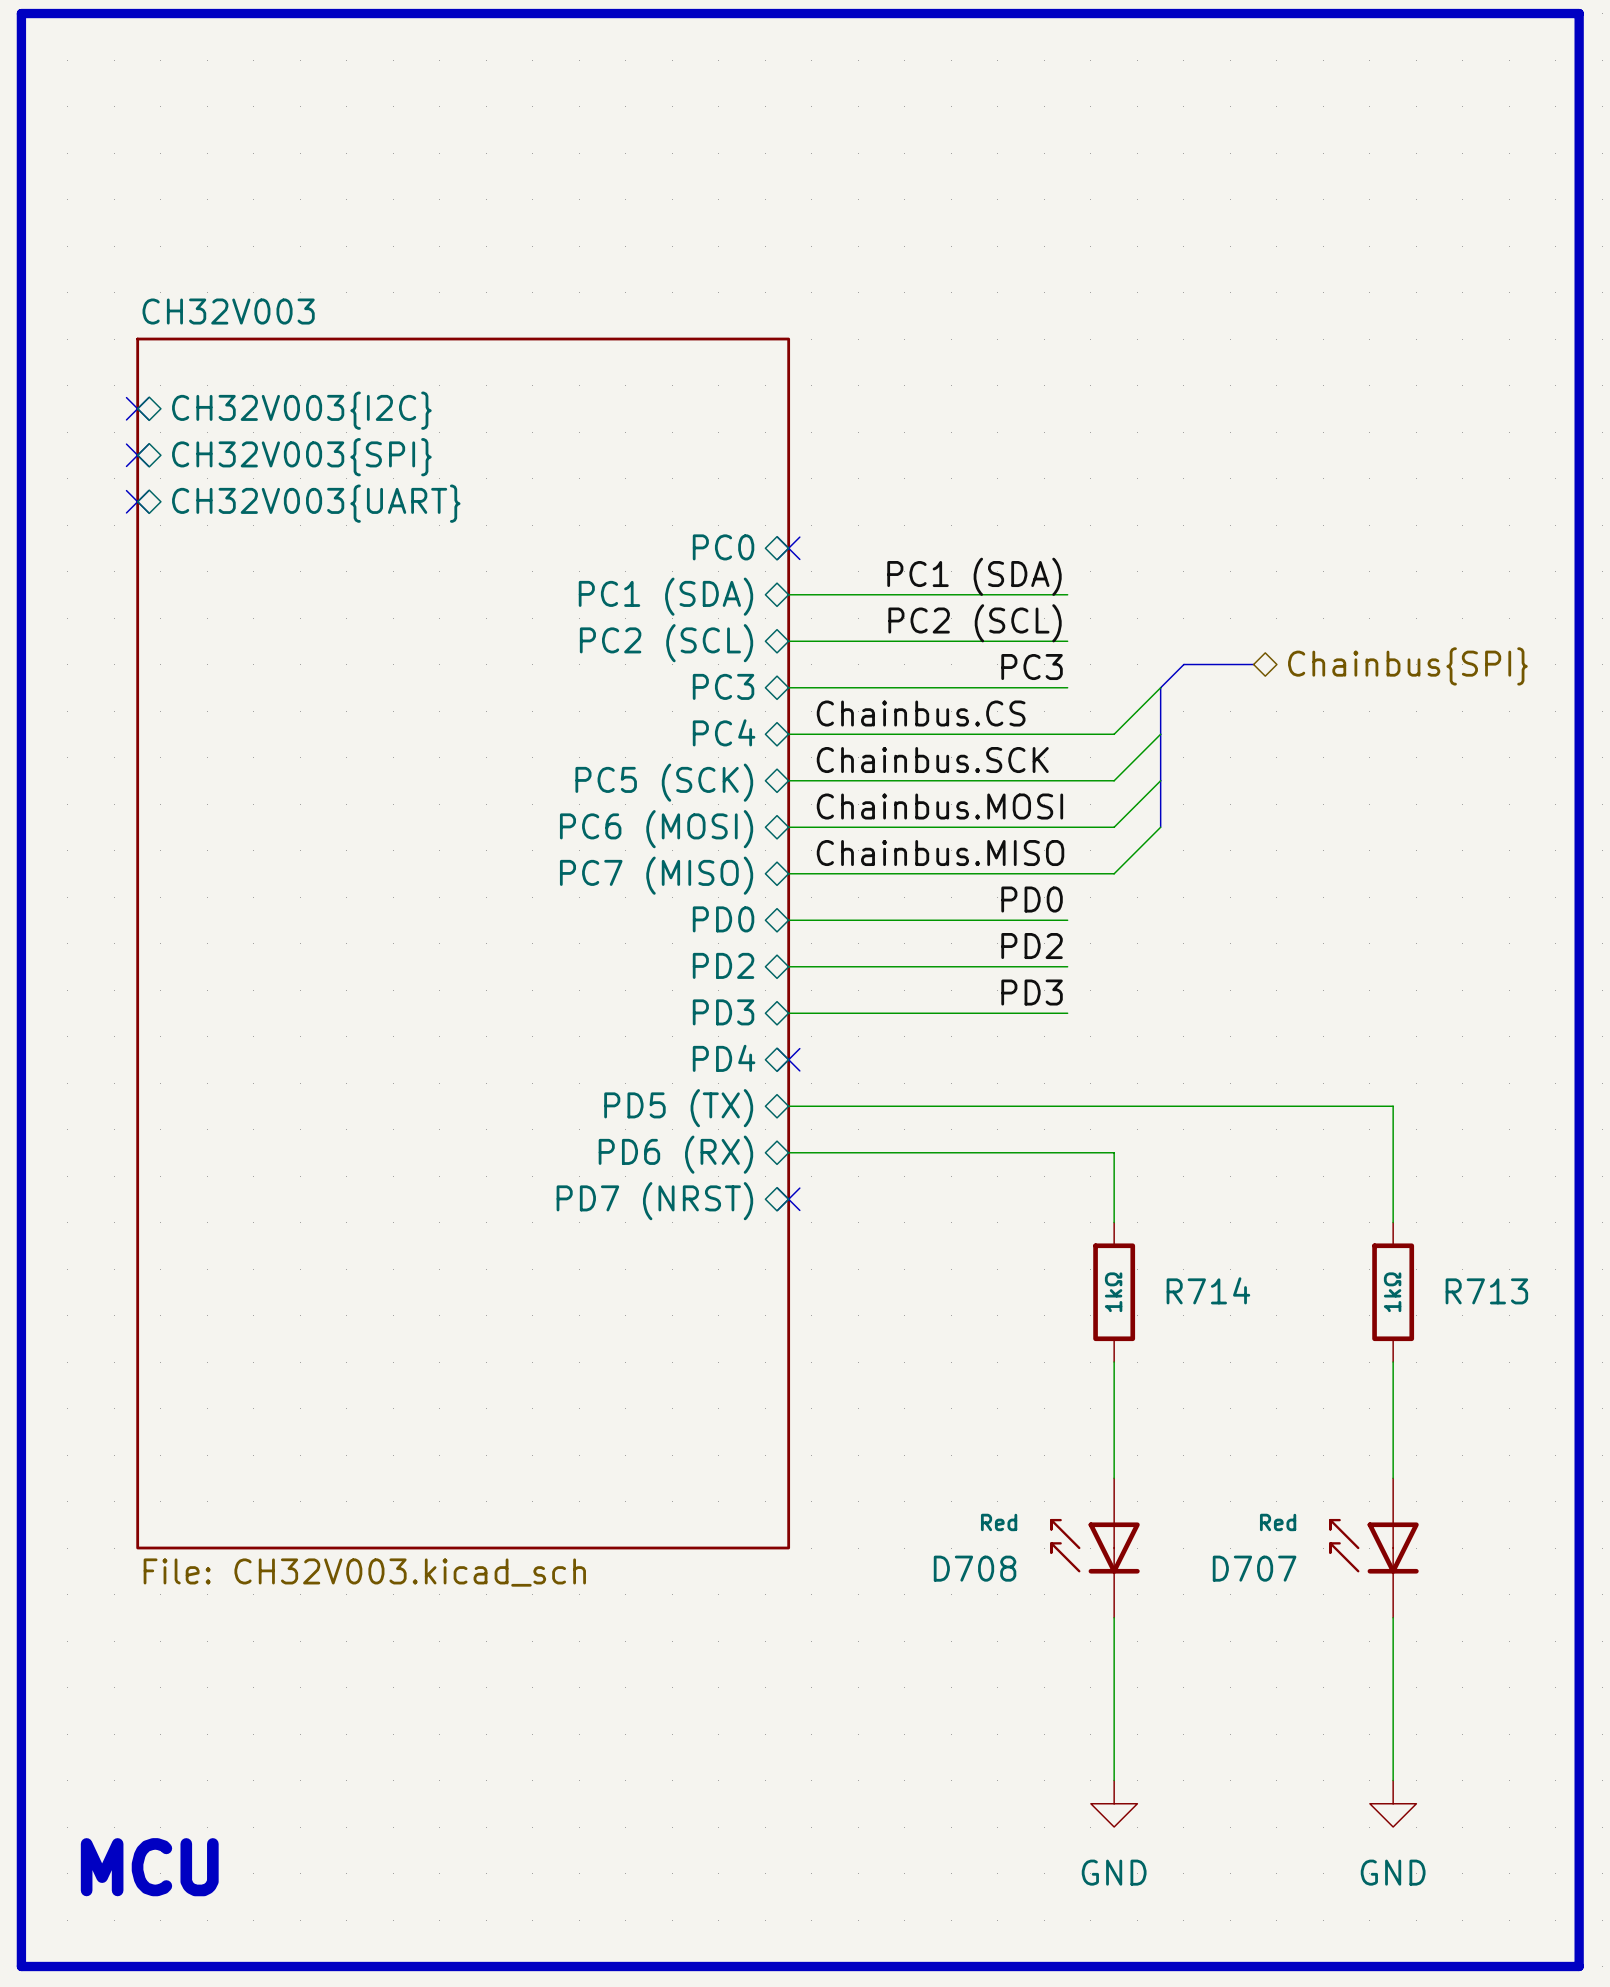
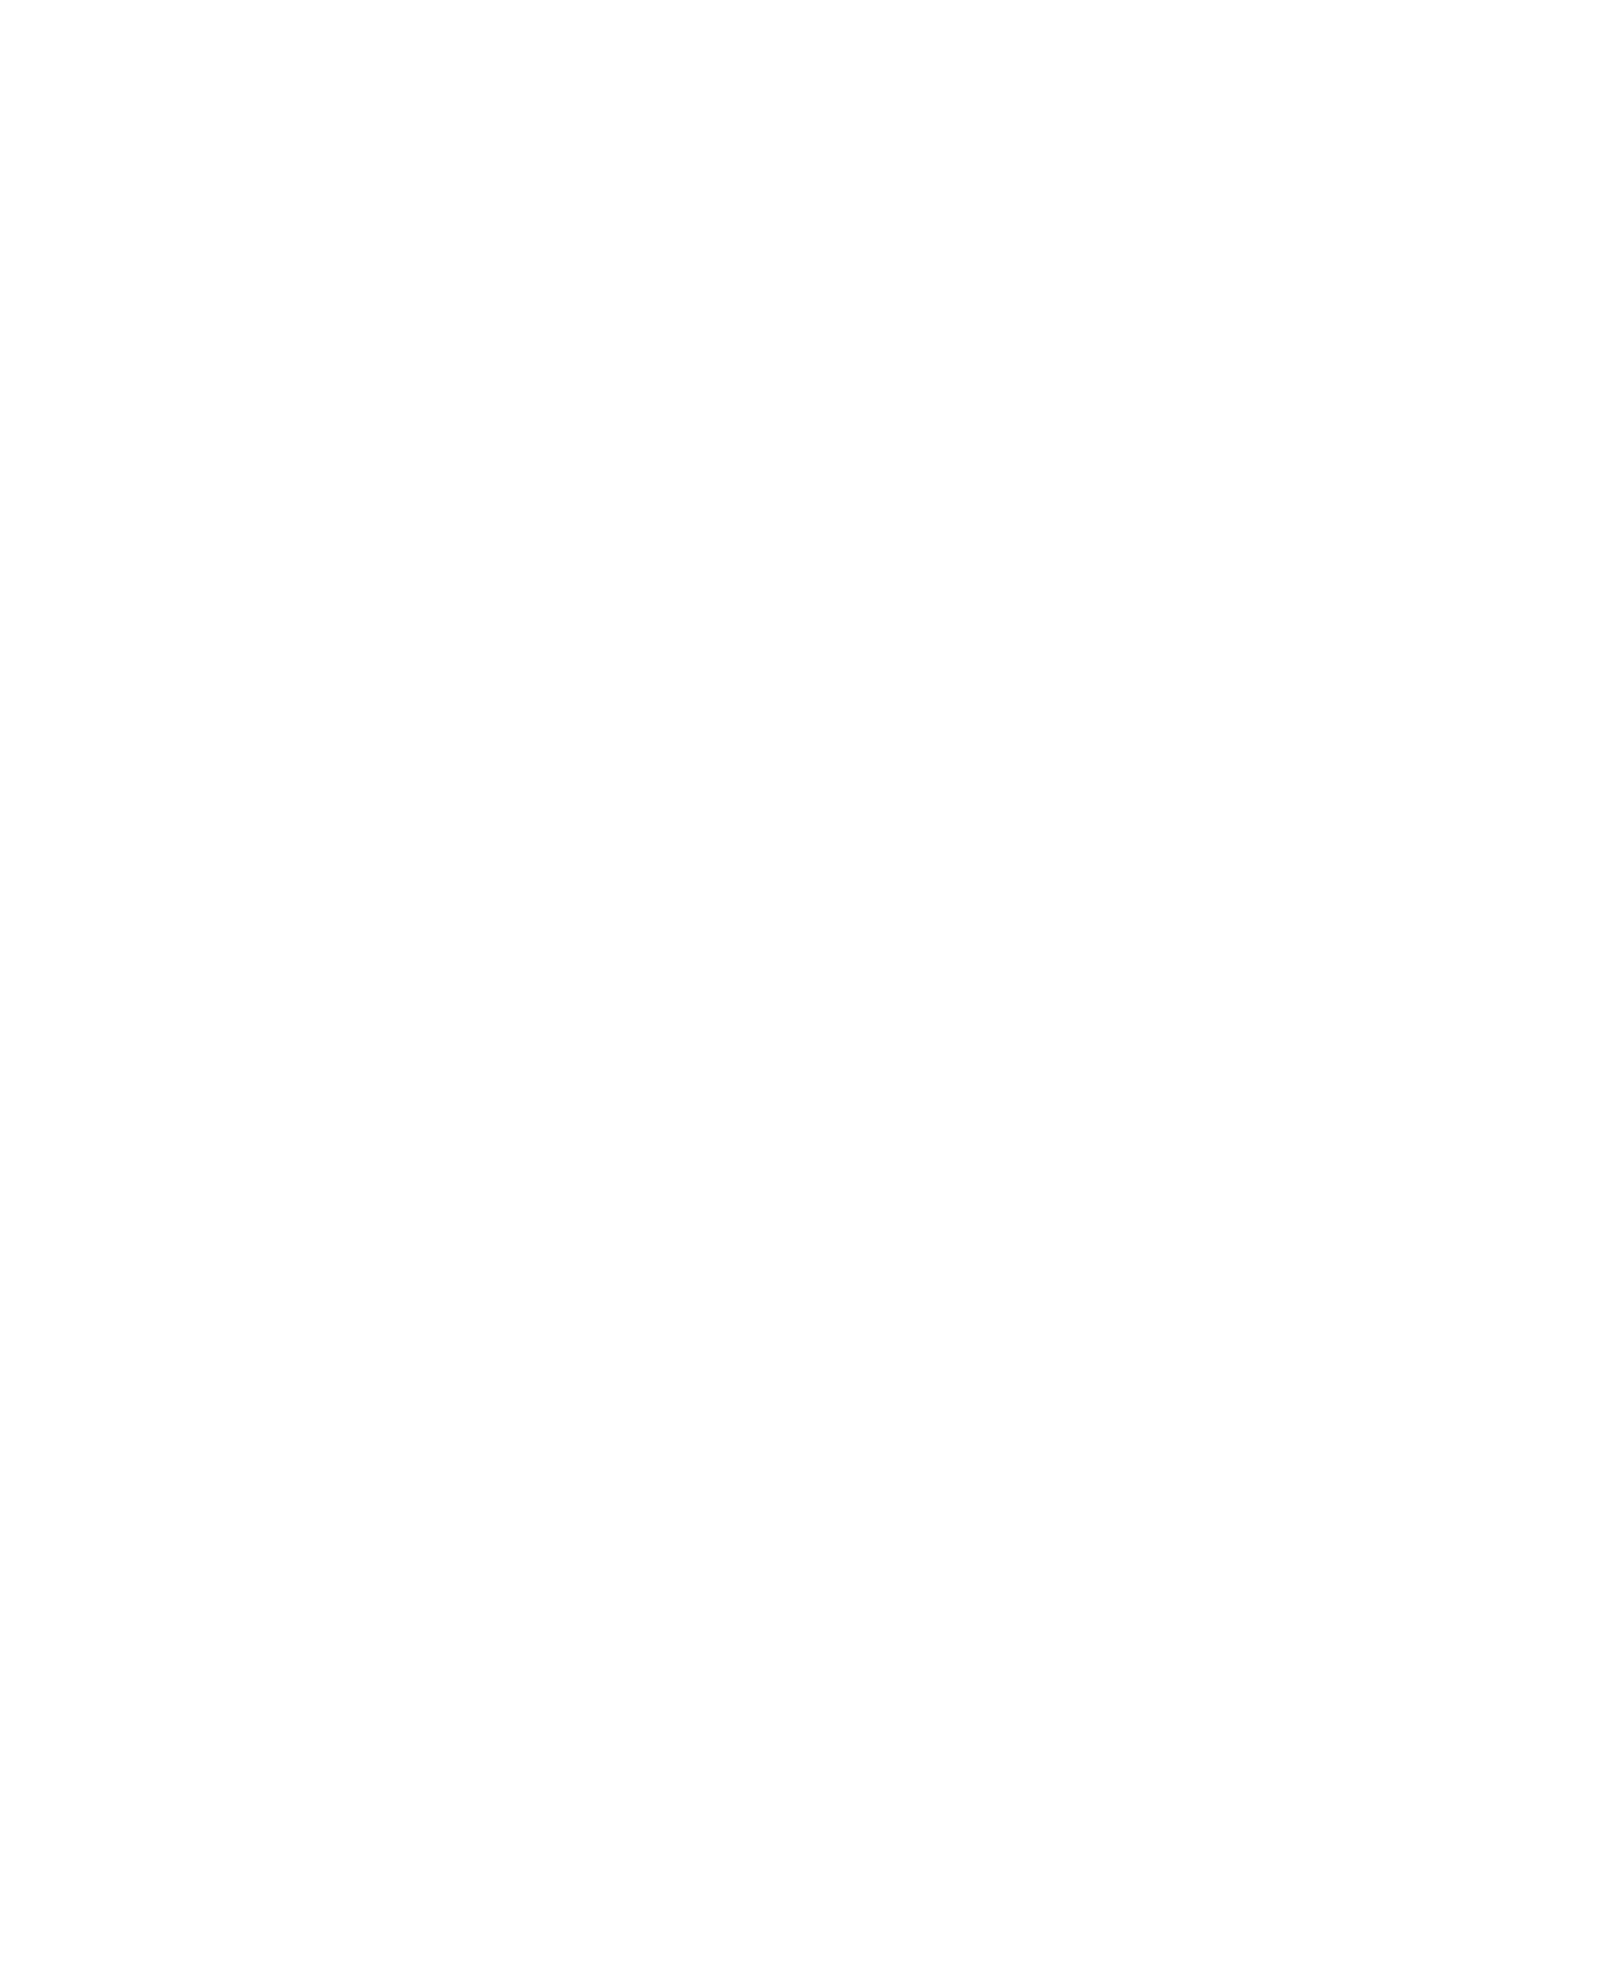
line: (21, 13) (1579, 13) (1579, 1966) (21, 1966) (21, 13) -> none
no-connect mark: (137, 408) -> none
sheet pin: CH32V003{I2C} (301, 410) -> none
no-connect mark: (137, 455) -> none
sheet pin: CH32V003{SPI} (301, 457) -> none
no-connect mark: (137, 501) -> none
sheet pin: CH32V003{UART} (316, 503) -> none
sheet pin: PC0 (723, 547) -> none
no-connect mark: (788, 548) -> none
label: PC1 (SDA) (974, 576) -> none
wire: (788, 594) (1067, 594) -> none
sheet pin: PC1 (SDA) (665, 596) -> none
label: PC2 (SCL) (975, 623) -> none
wire: (788, 641) (1067, 641) -> none
sheet pin: PC2 (SCL) (666, 643) -> none
bus: (1253, 664) (1183, 664) (1160, 687) (1160, 827) -> none
hierarchical label: Chainbus{SPI} (1407, 666) -> none
label: PC3 (1032, 667) -> none
sheet pin: PC3 (723, 686) -> none
wire: (788, 687) (1067, 687) -> none
wire: (1160, 687) (1114, 734) (788, 734) -> none
label: Chainbus.CS (921, 713) -> none
sheet pin: PC4 (724, 732) -> none
wire: (1160, 734) (1114, 780) (788, 780) -> none
label: Chainbus.SCK (932, 760) -> none
wire: (1160, 780) (1114, 827) (788, 827) -> none
sheet pin: PC5 (SCK) (664, 782) -> none
label: Chainbus.MOSI (939, 806) -> none
wire: (1160, 827) (1114, 873) (788, 873) -> none
sheet pin: PC6 (MOSI) (656, 829) -> none
label: Chainbus.MISO (940, 853) -> none
sheet pin: PC7 (MISO) (656, 875) -> none
label: PD0 (1032, 899) -> none
sheet pin: PD0 (723, 919) -> none
wire: (788, 920) (1067, 920) -> none
sheet CH32V003: File: CH32V003.kicad_sch (463, 943) -> none
label: PD2 (1032, 946) -> none
sheet pin: PD2 (723, 965) -> none
wire: (788, 966) (1067, 966) -> none
label: PD3 (1032, 992) -> none
sheet pin: PD3 (723, 1012) -> none
wire: (788, 1013) (1067, 1013) -> none
sheet pin: PD4 (724, 1058) -> none
no-connect mark: (788, 1059) -> none
wire: (788, 1106) (1393, 1106) (1393, 1222) -> none
sheet pin: PD5 (TX) (678, 1108) -> none
wire: (788, 1152) (1114, 1152) (1114, 1222) -> none
sheet pin: PD6 (RX) (675, 1154) -> none
no-connect mark: (788, 1199) -> none
sheet pin: PD7 (NRST) (654, 1201) -> none
R714: 1kΩ (1114, 1292) -> none
R713: 1kΩ (1393, 1292) -> none
wire: (1114, 1362) (1114, 1478) -> none
wire: (1393, 1362) (1393, 1478) -> none
D708: Red (1094, 1548) -> none
D707: Red (1373, 1548) -> none
wire: (1114, 1617) (1114, 1780) -> none
wire: (1393, 1617) (1393, 1780) -> none
power symbol: GND (1114, 1803) -> none
power symbol: GND (1393, 1803) -> none
text: MCU (149, 1867) -> none

